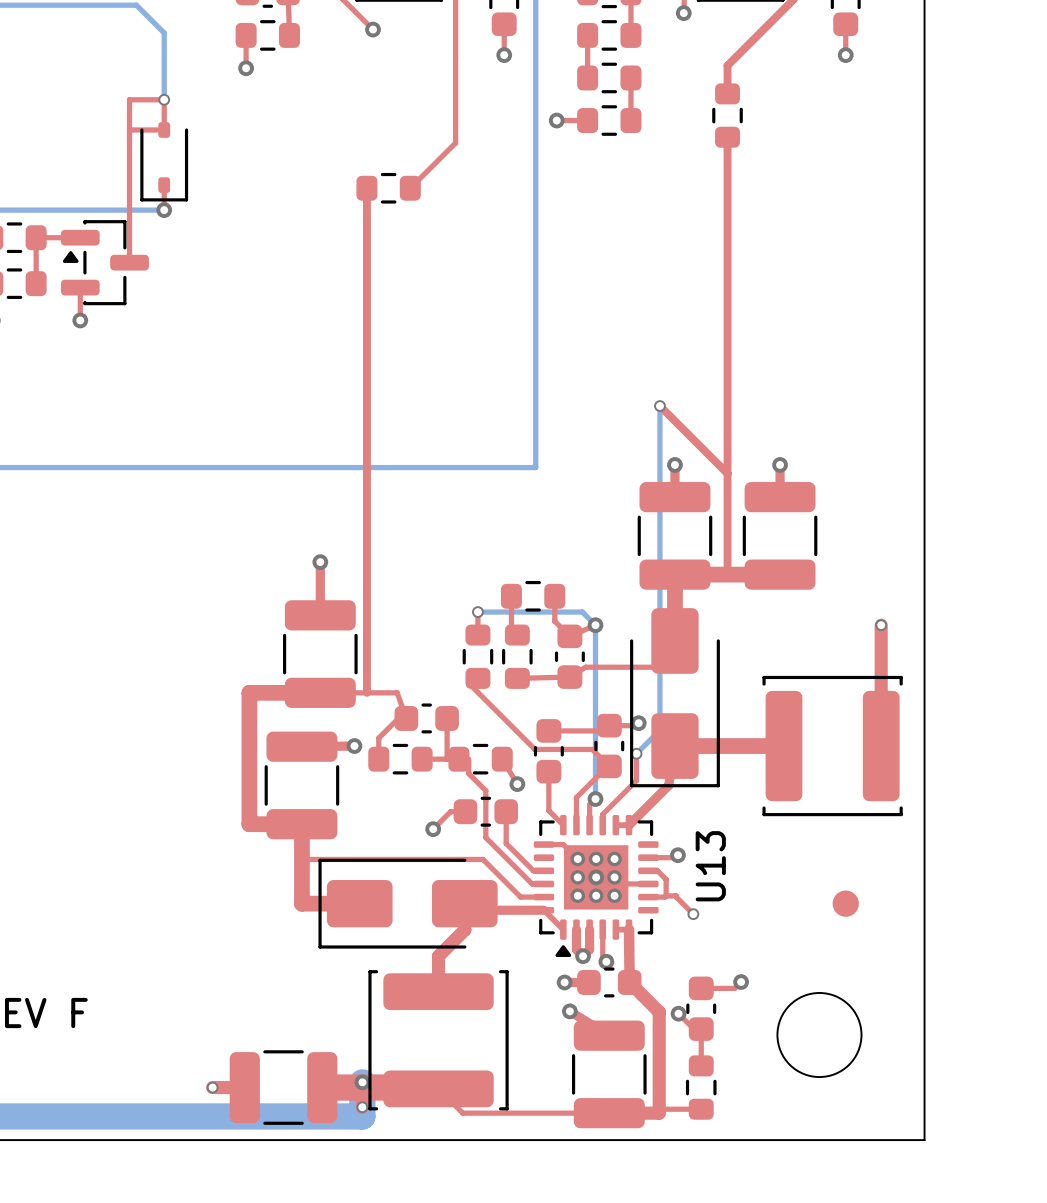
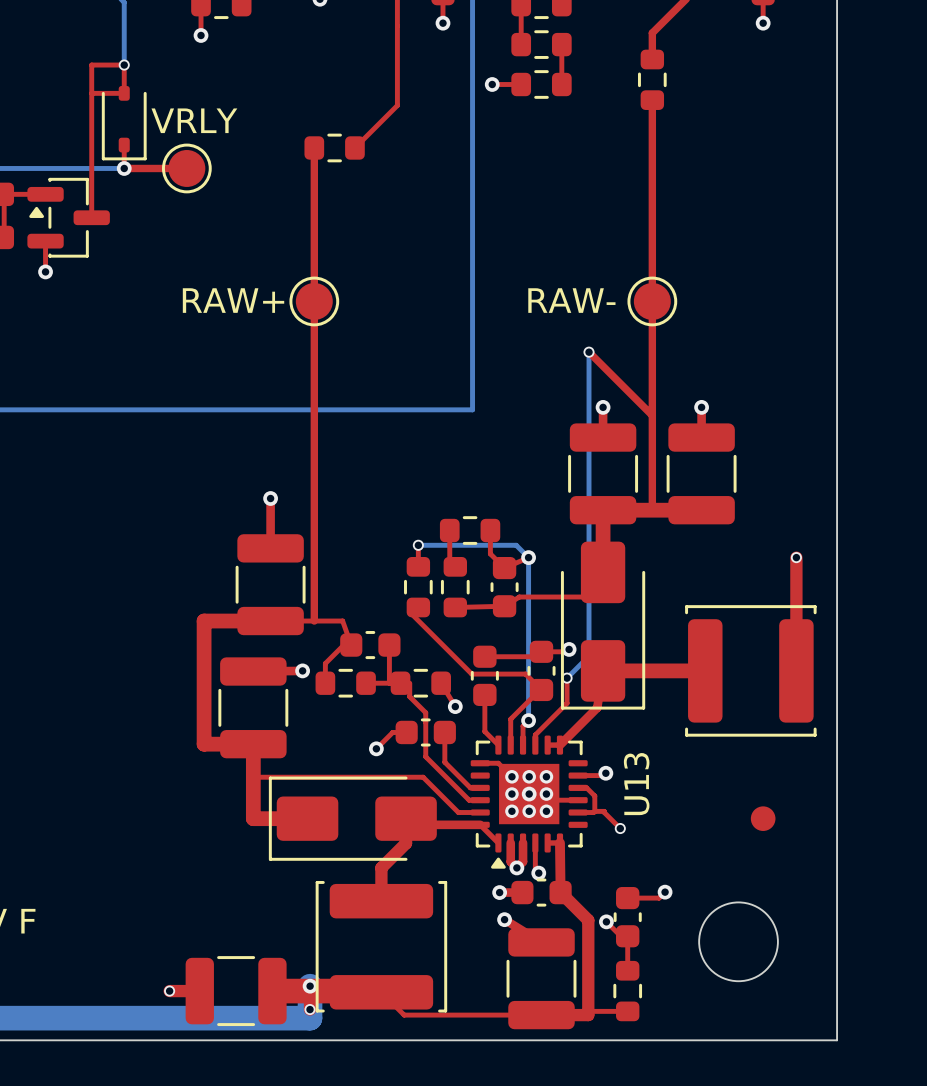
text: none -> VRLY (194, 120)
top track: none -> (125, 168) (186, 168)
part: none -> (186, 168)
text: none -> RAW+ (233, 300)
text: none -> RAW- (571, 300)
part: none -> (314, 301)
part: none -> (652, 301)

